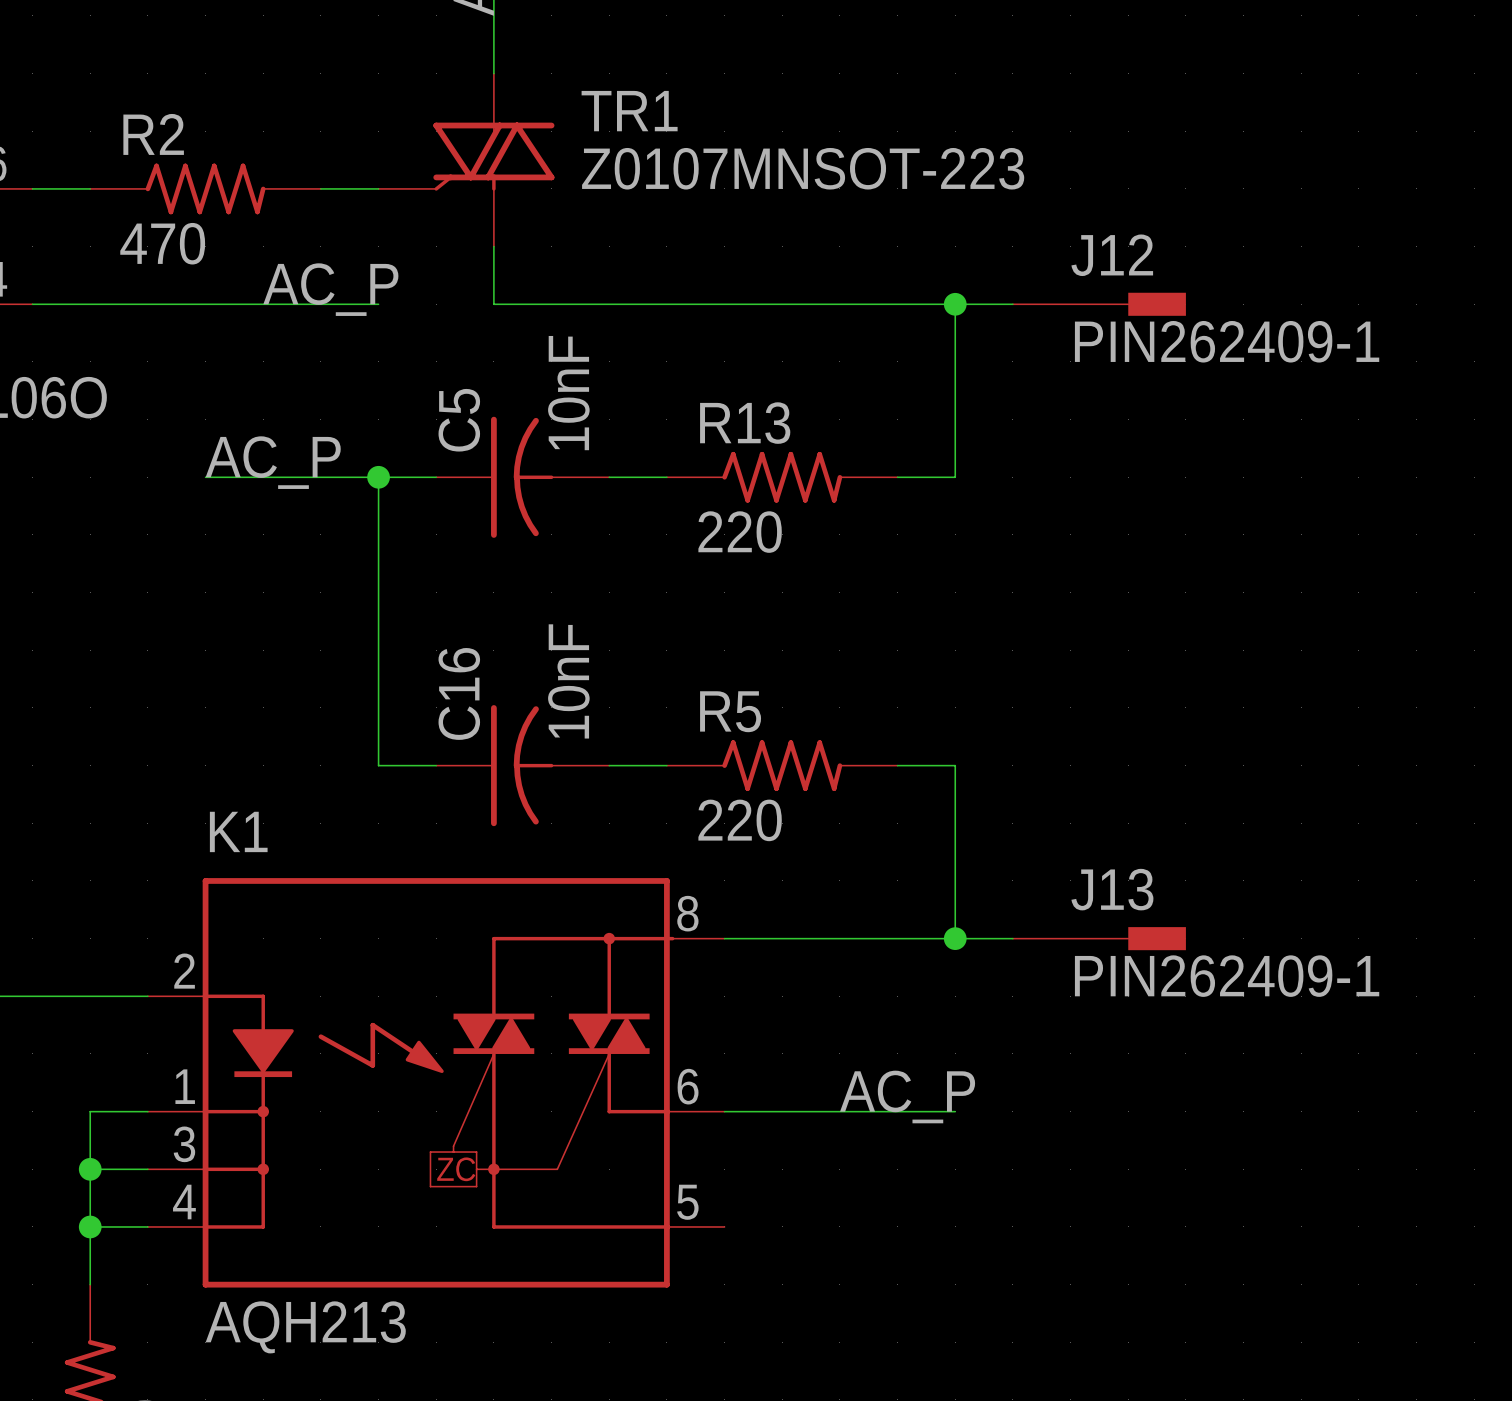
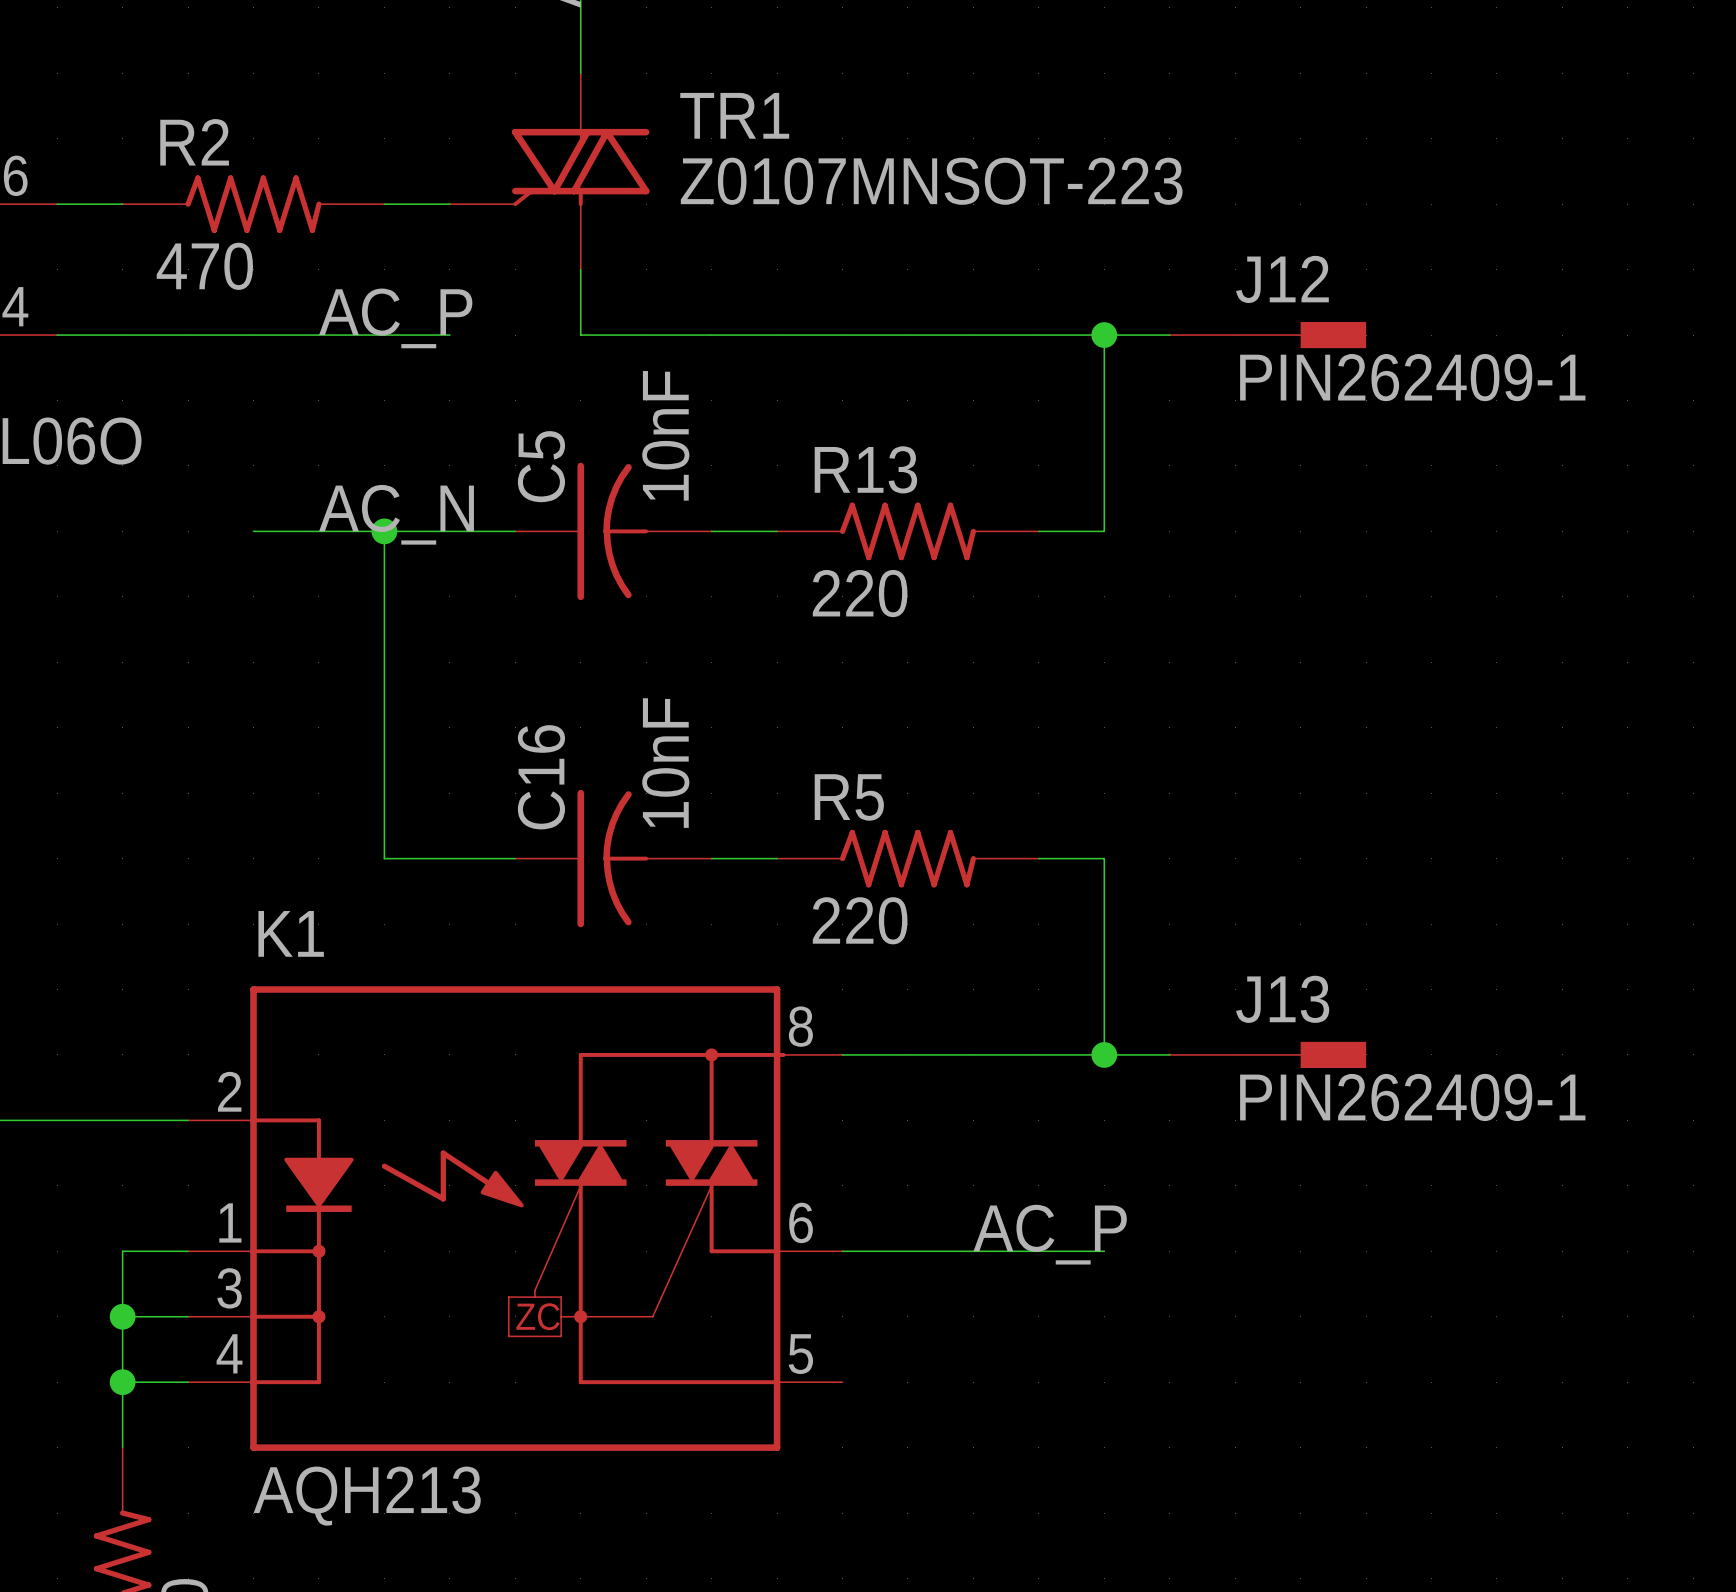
label: AC_P (273, 462) -> AC_N (396, 514)
wire: (378, 477) (378, 765) -> (384, 531) (384, 858) (449, 858)
junction position: (378, 477) -> (384, 531)

